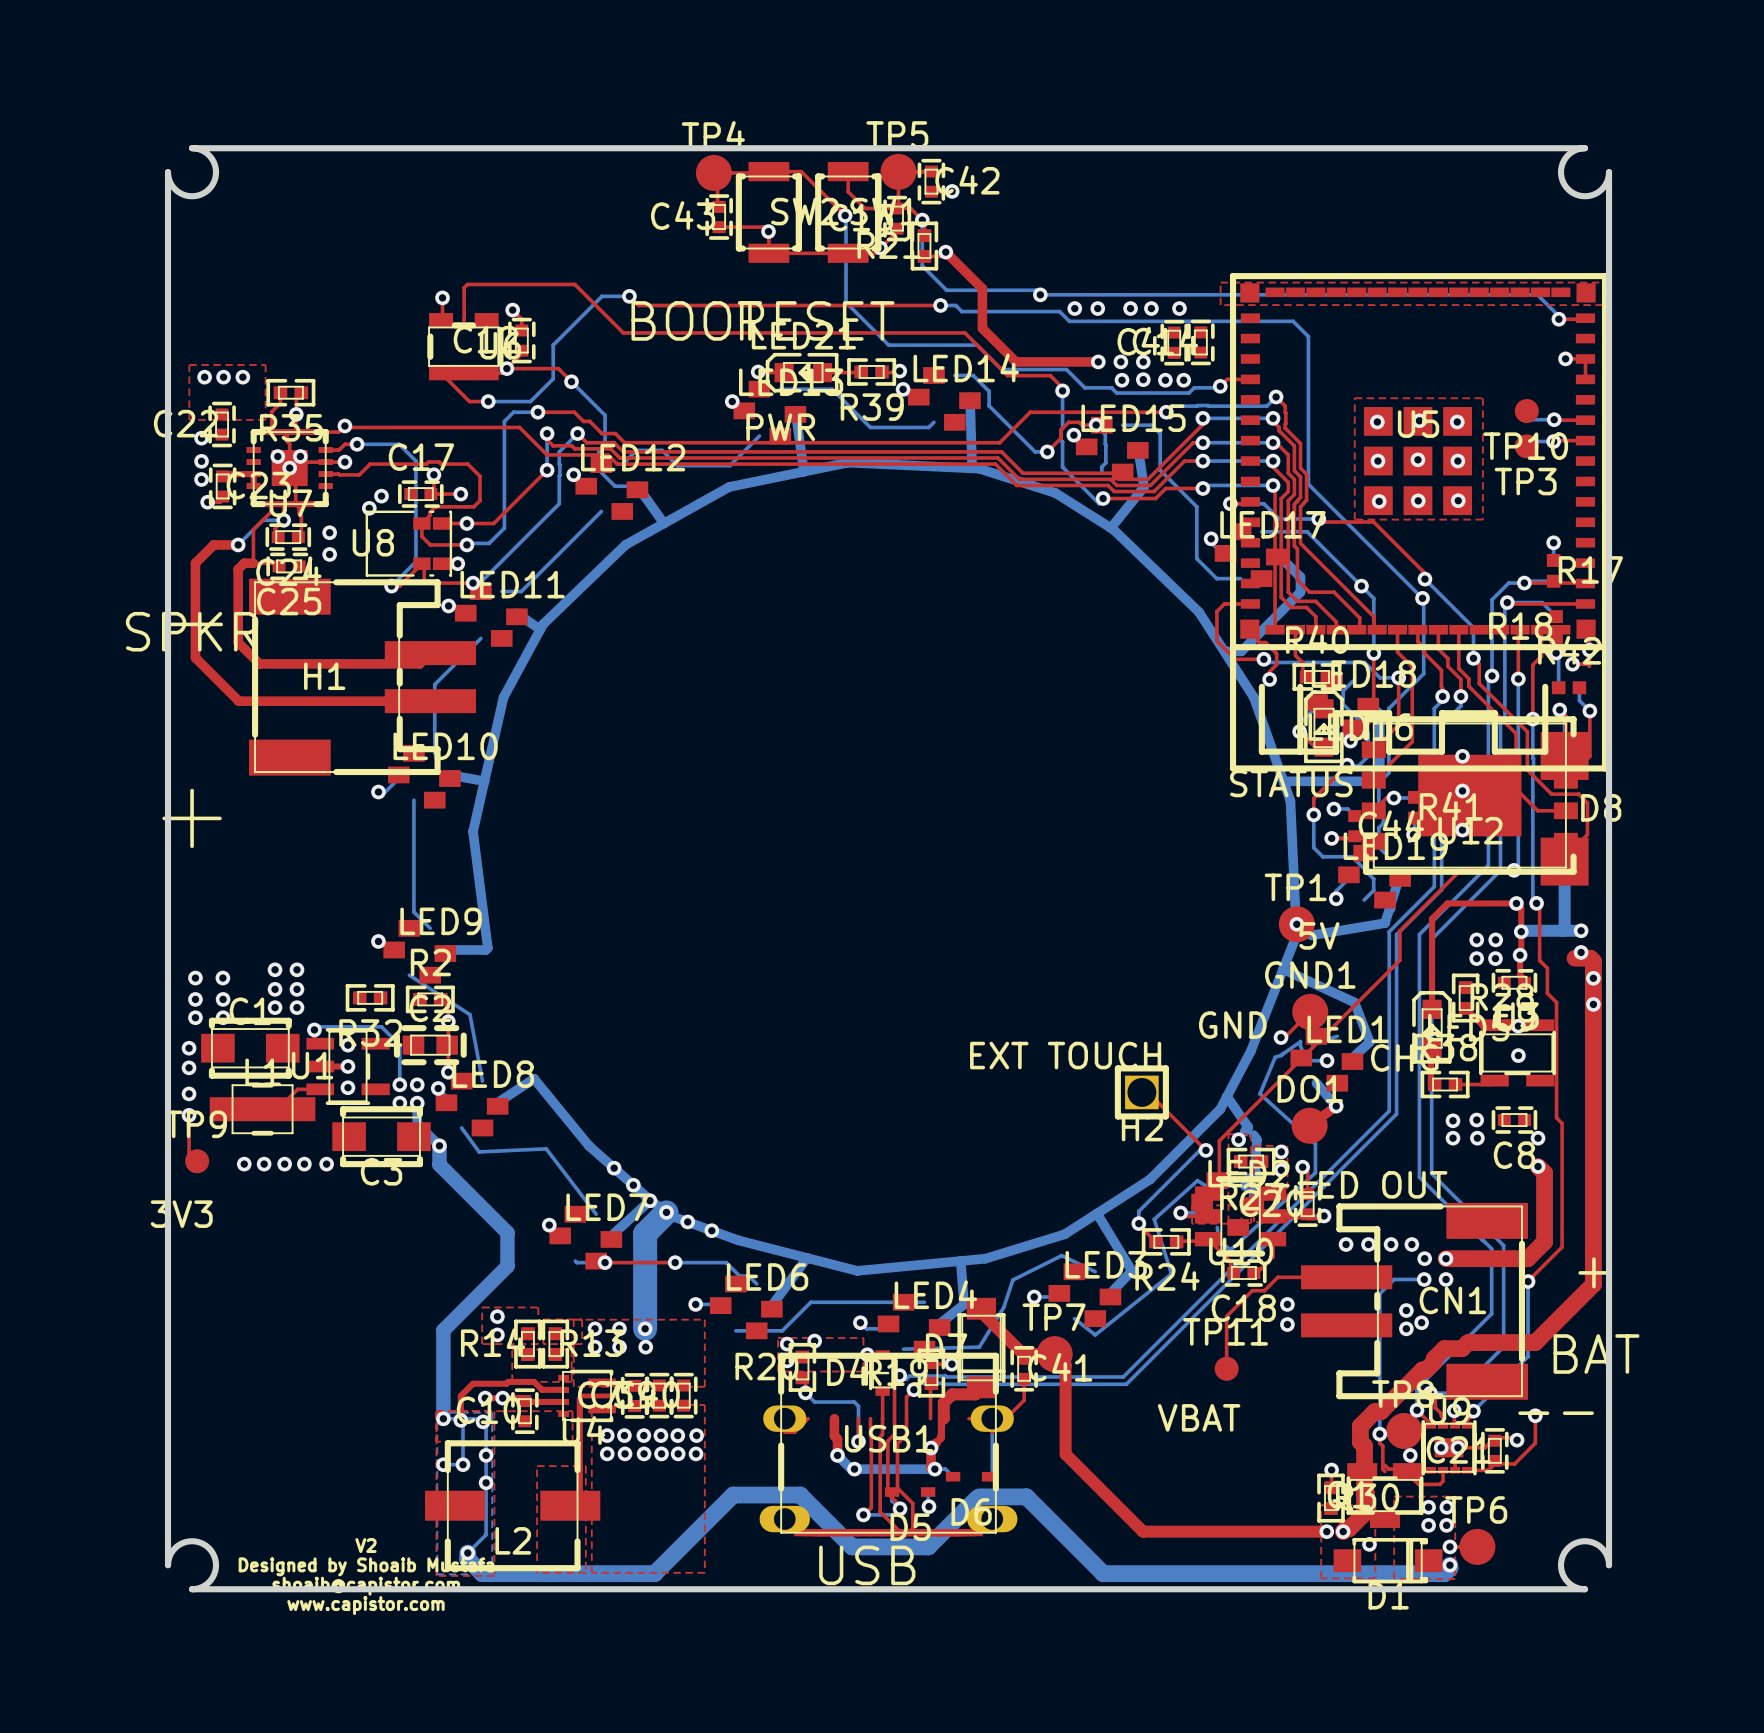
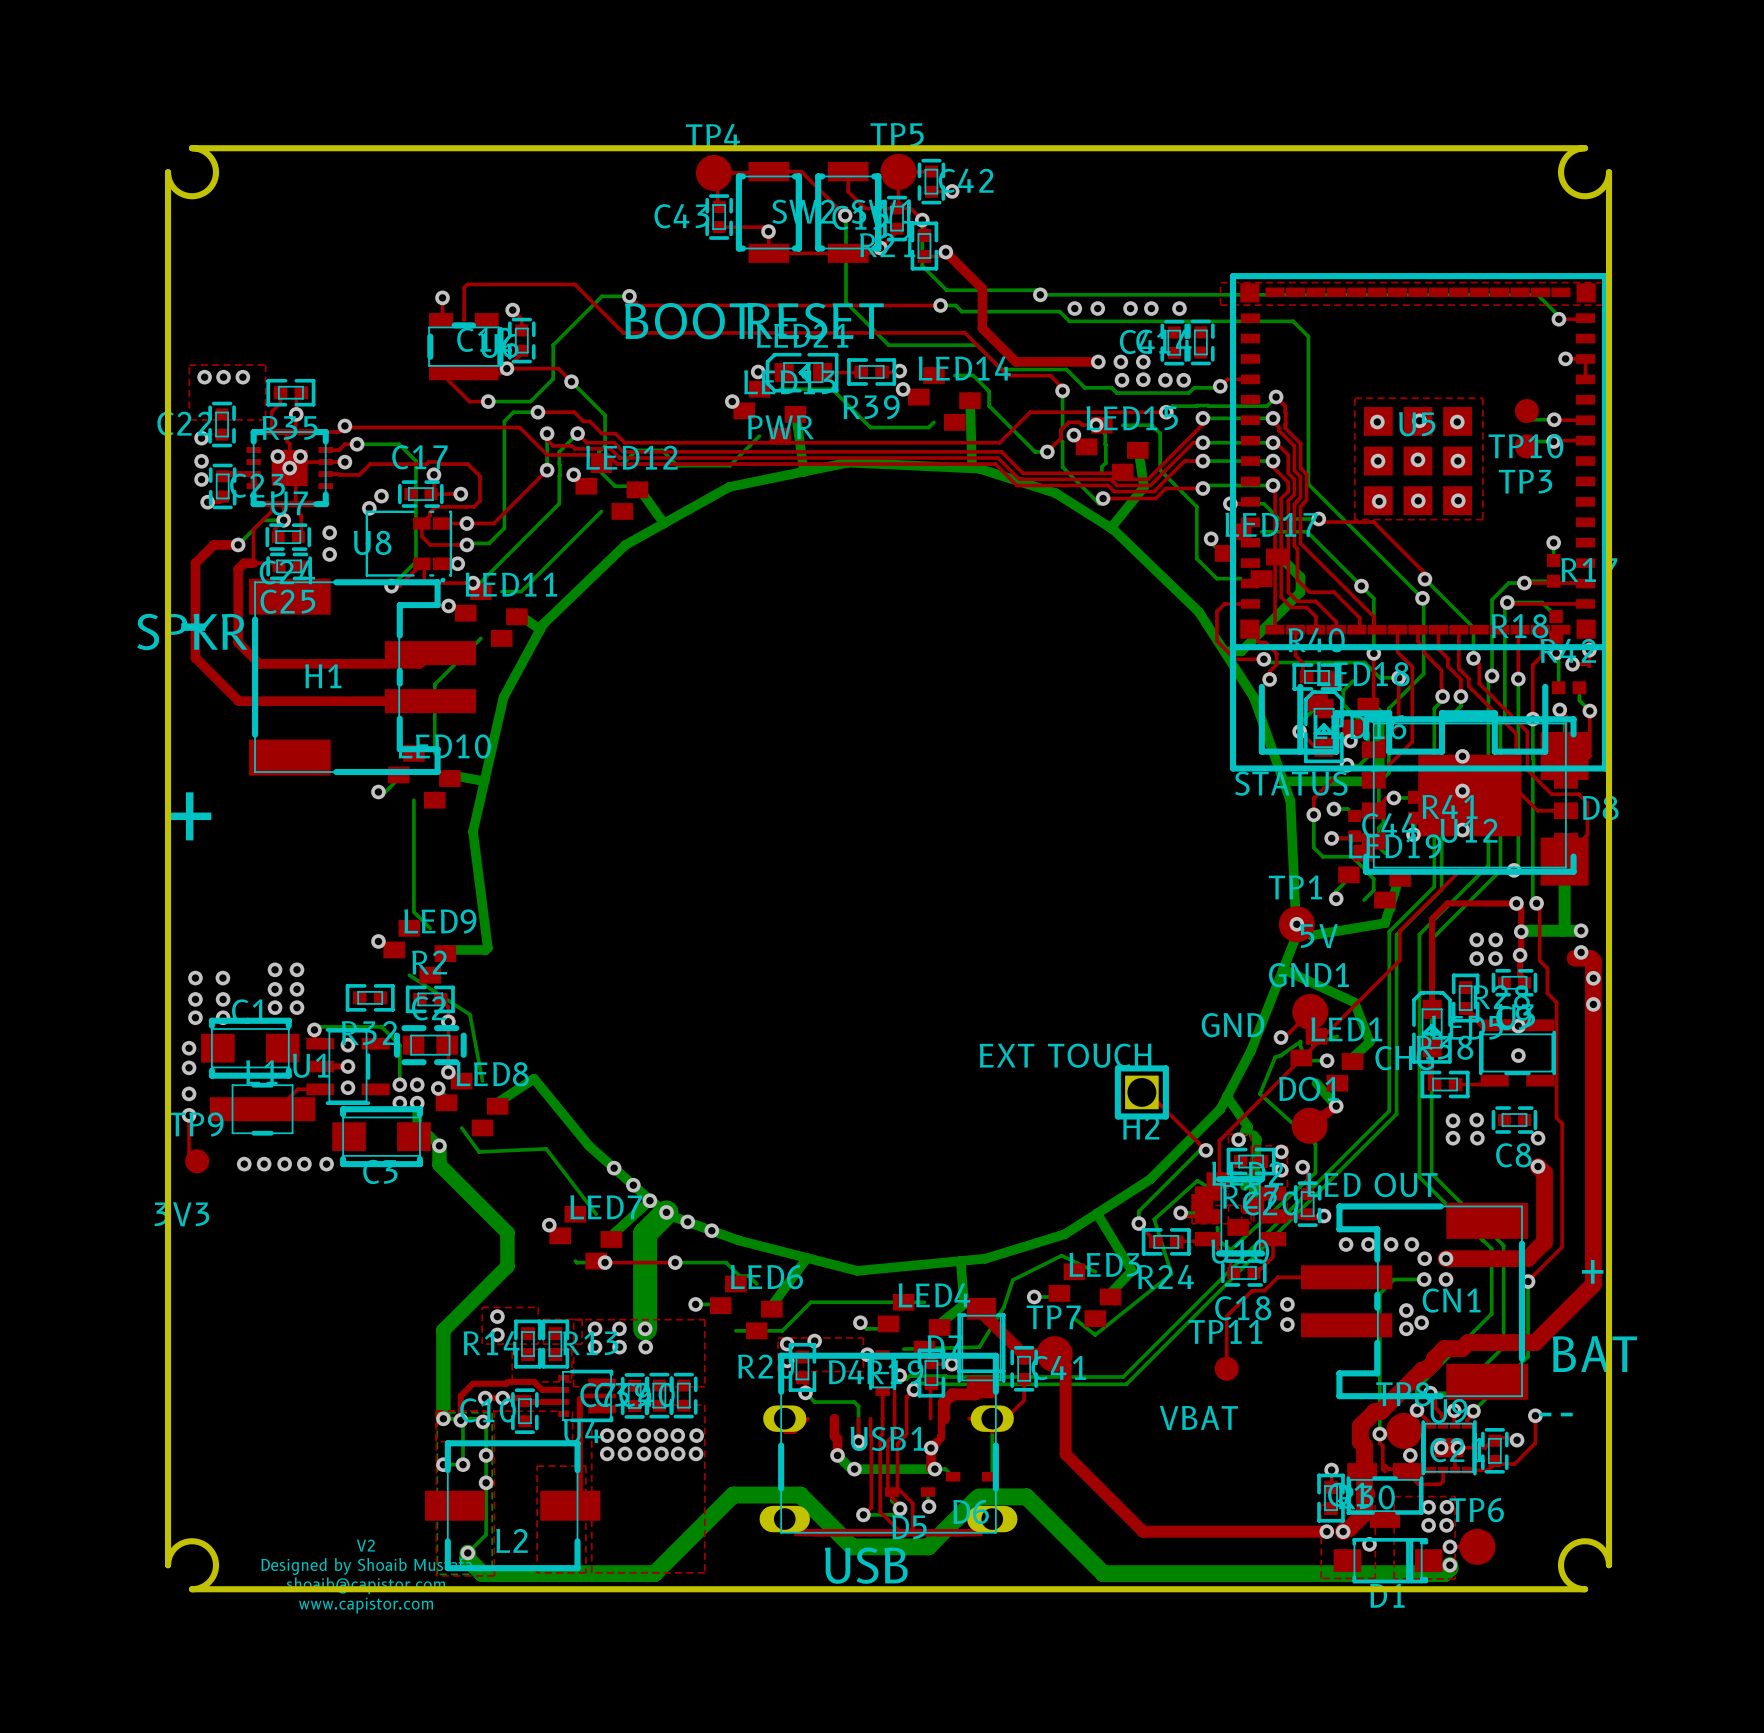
U8 footprint: [365, 510, 453, 577] -> [365, 510, 453, 583]

